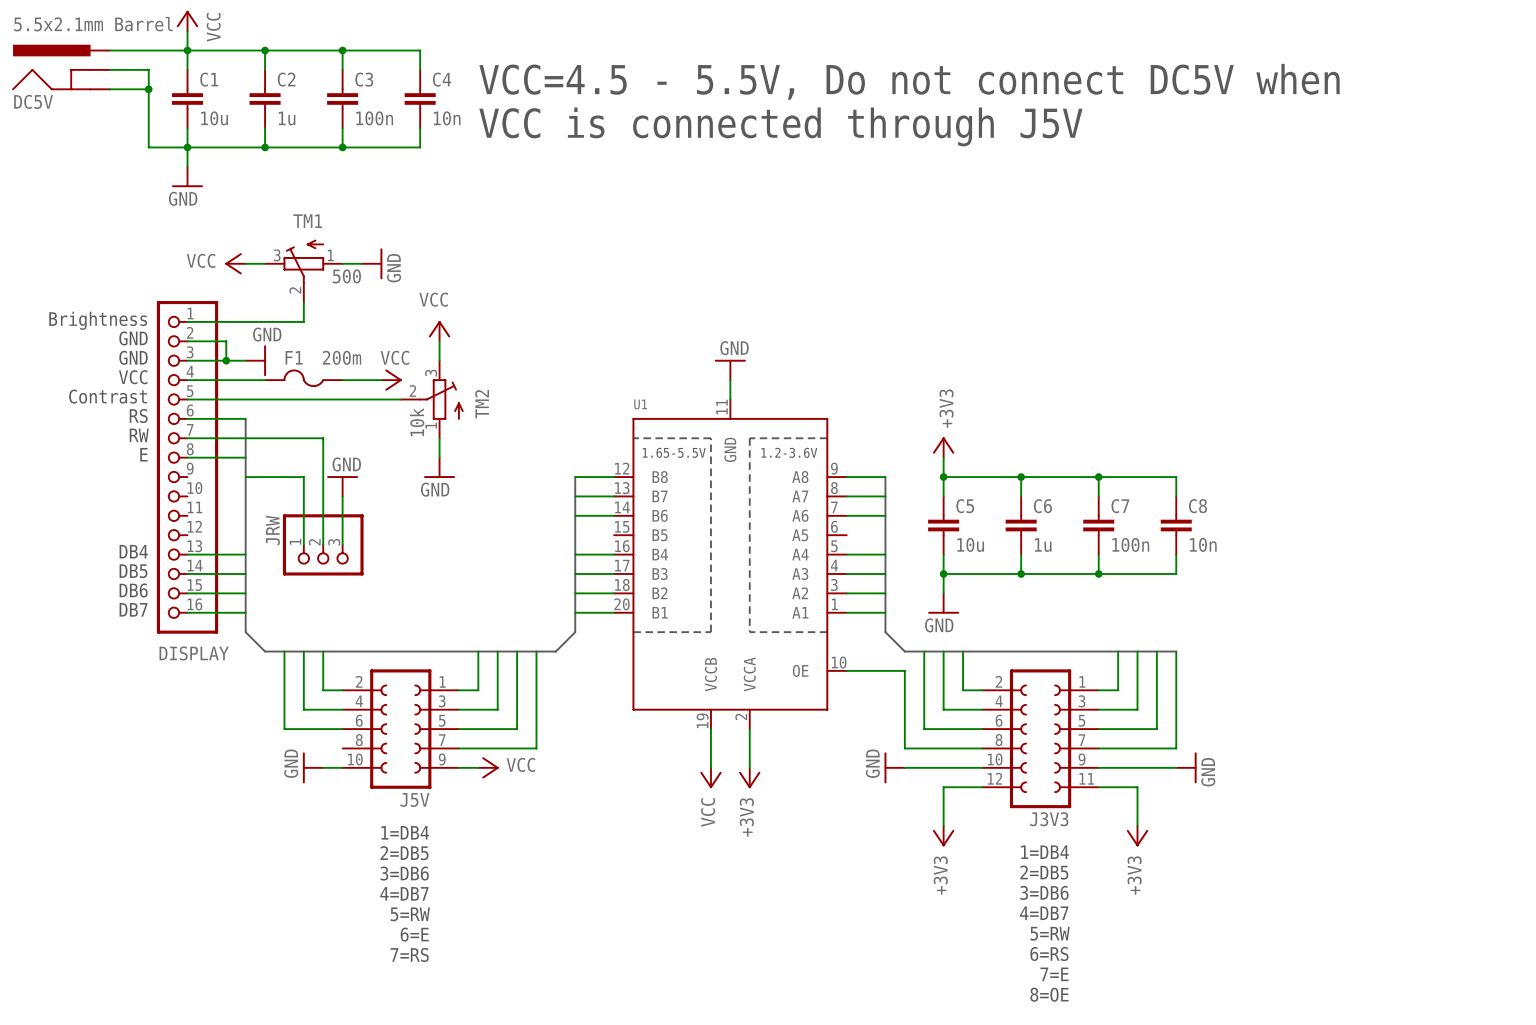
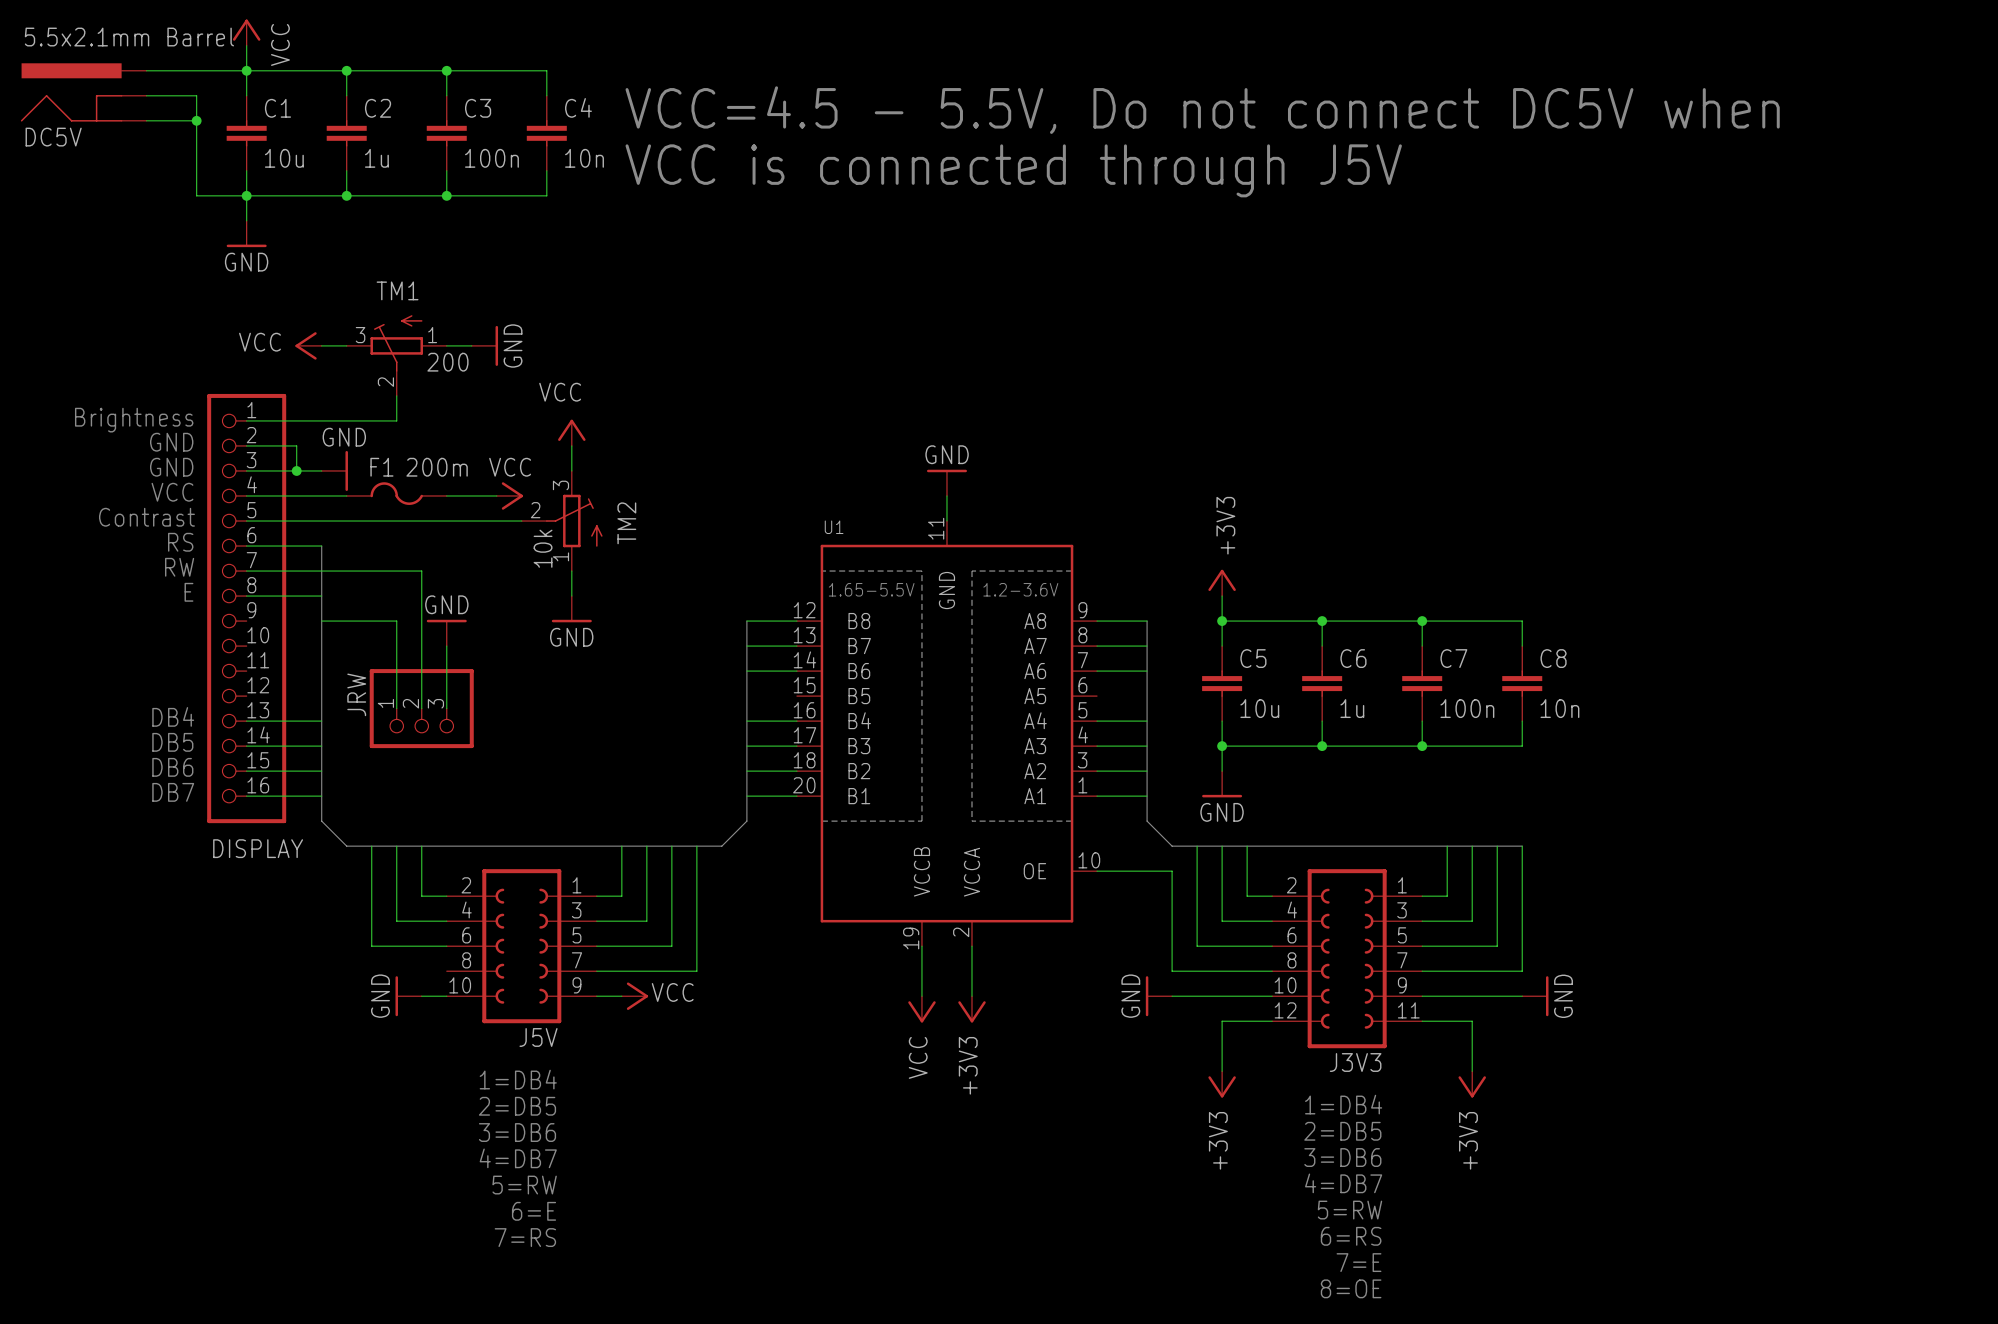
TM1 value: 500 (346, 276) -> 200 (447, 362)

